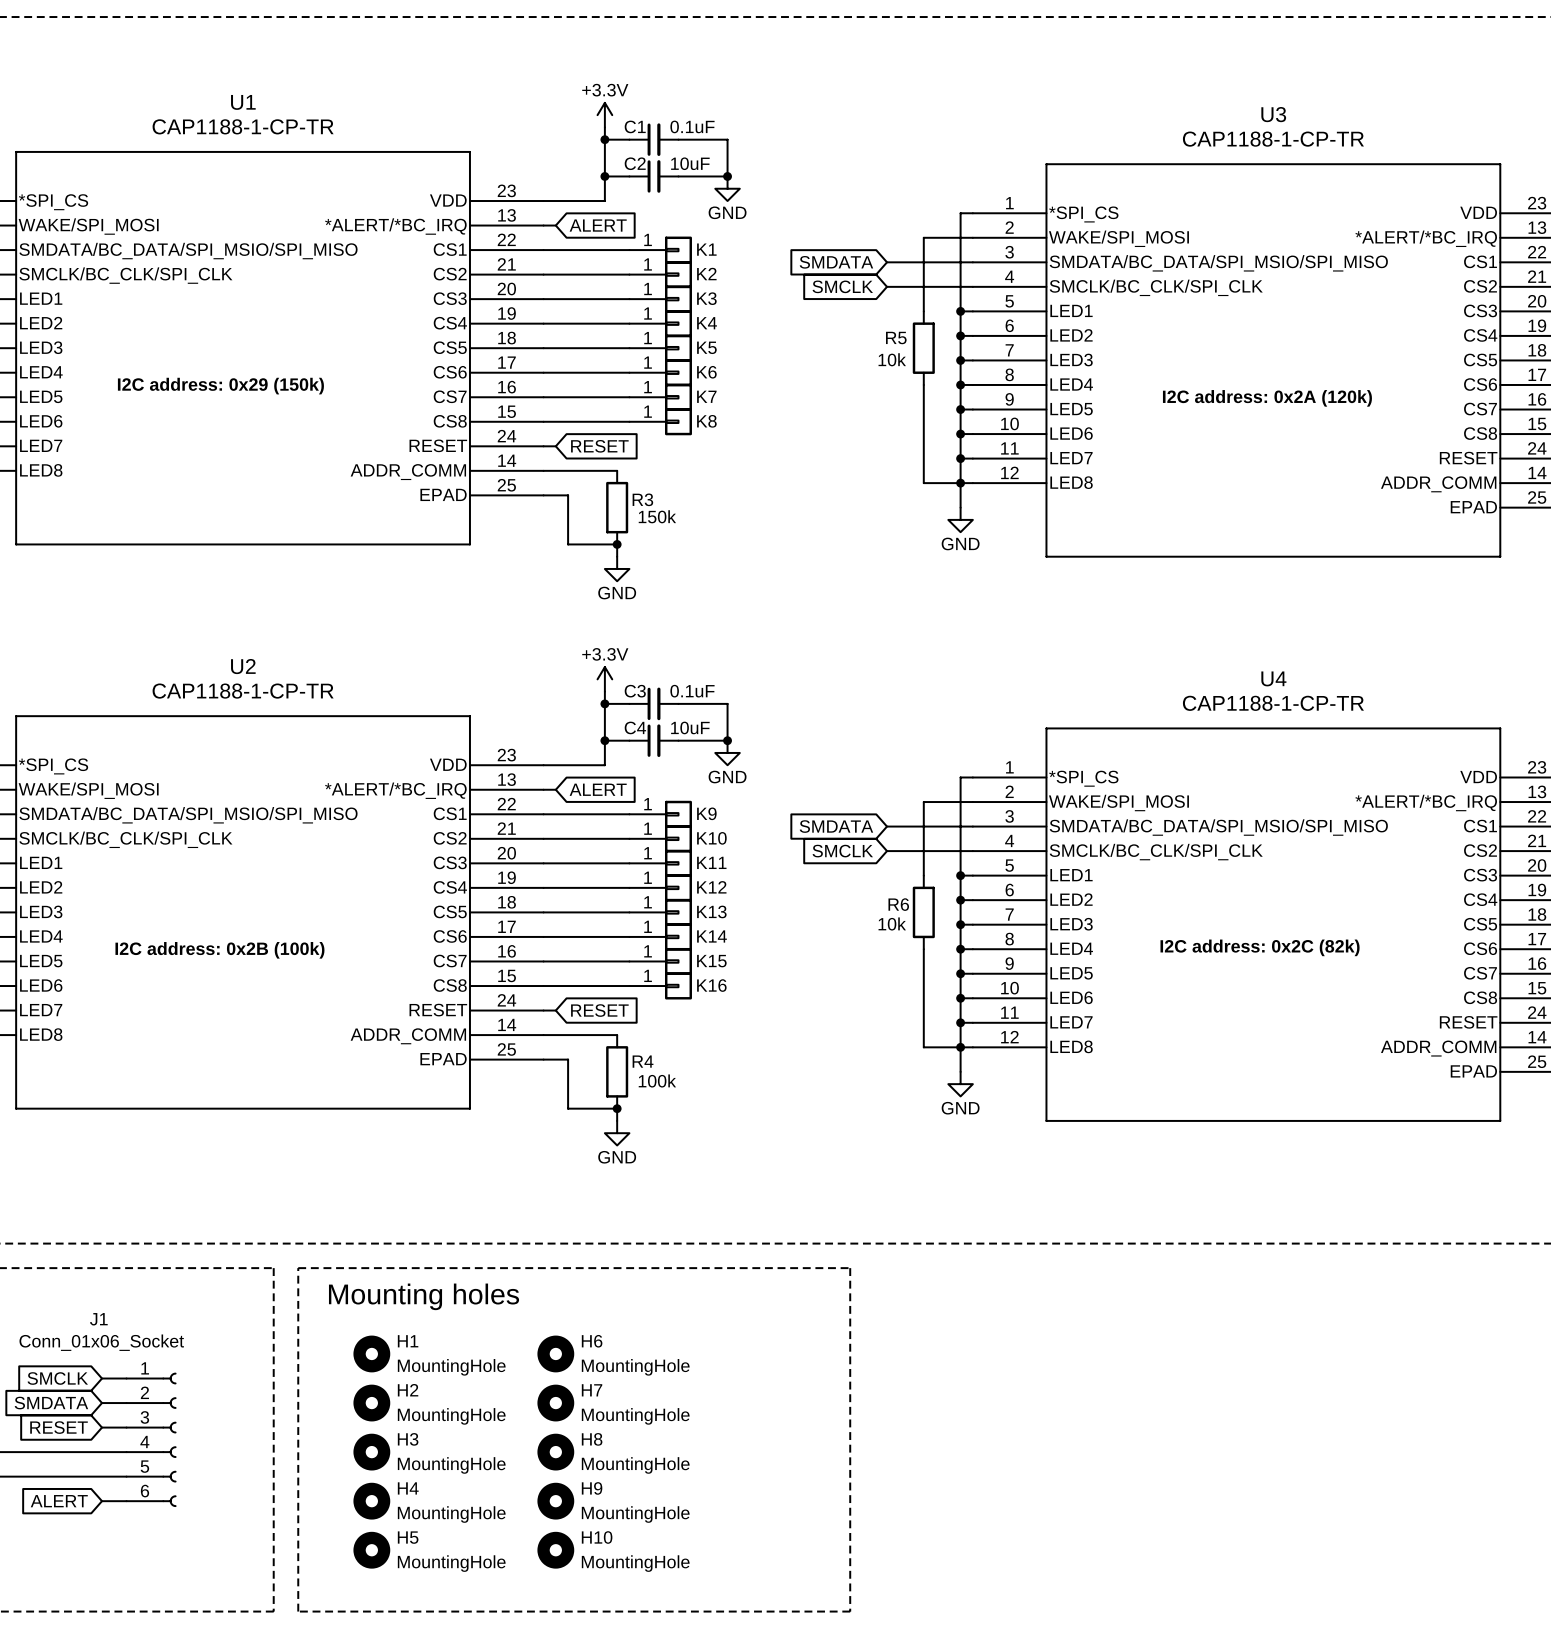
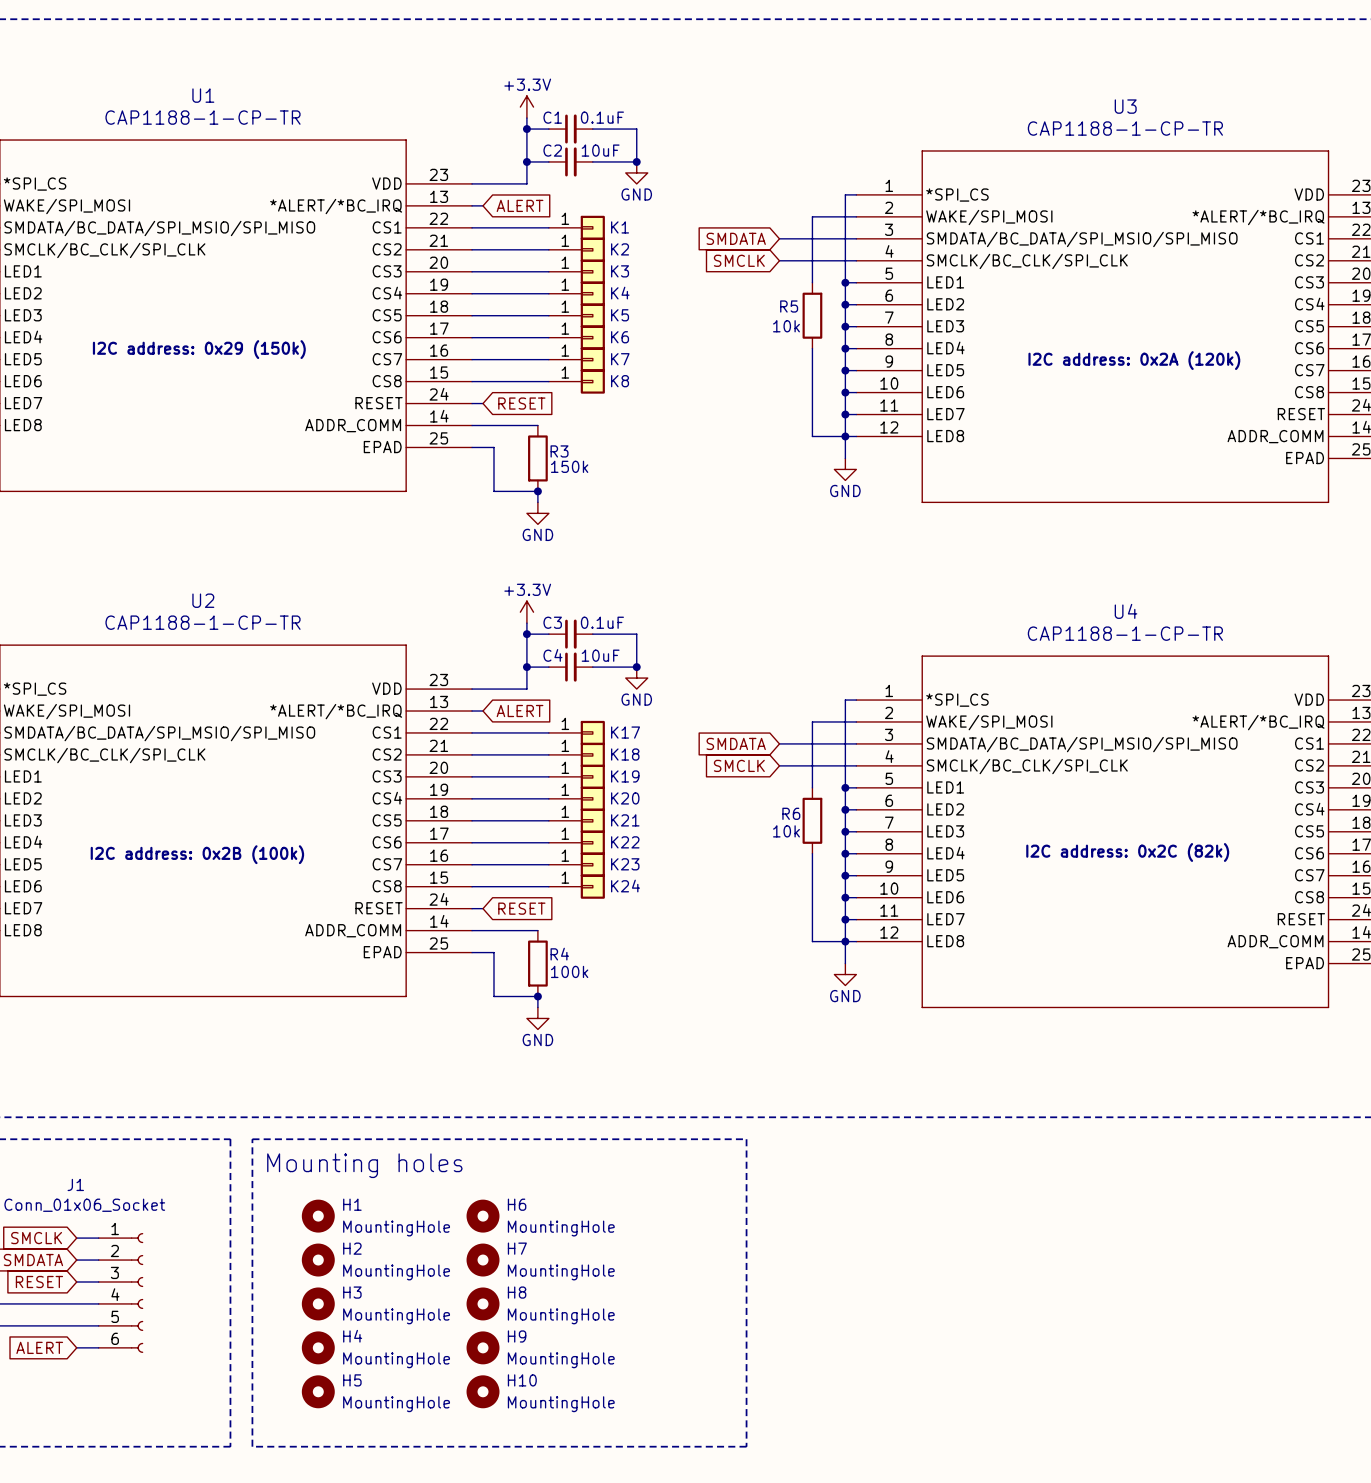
K9 name: K9 (706, 813) -> K17 (625, 732)
K10 name: K10 (711, 838) -> K18 (625, 754)
K11 name: K11 (711, 862) -> K19 (625, 776)
K12 name: K12 (711, 887) -> K20 (625, 798)
K13 name: K13 (711, 911) -> K21 (625, 820)
K14 name: K14 (711, 936) -> K22 (625, 842)
K15 name: K15 (711, 961) -> K23 (625, 864)
K16 name: K16 (711, 985) -> K24 (625, 886)

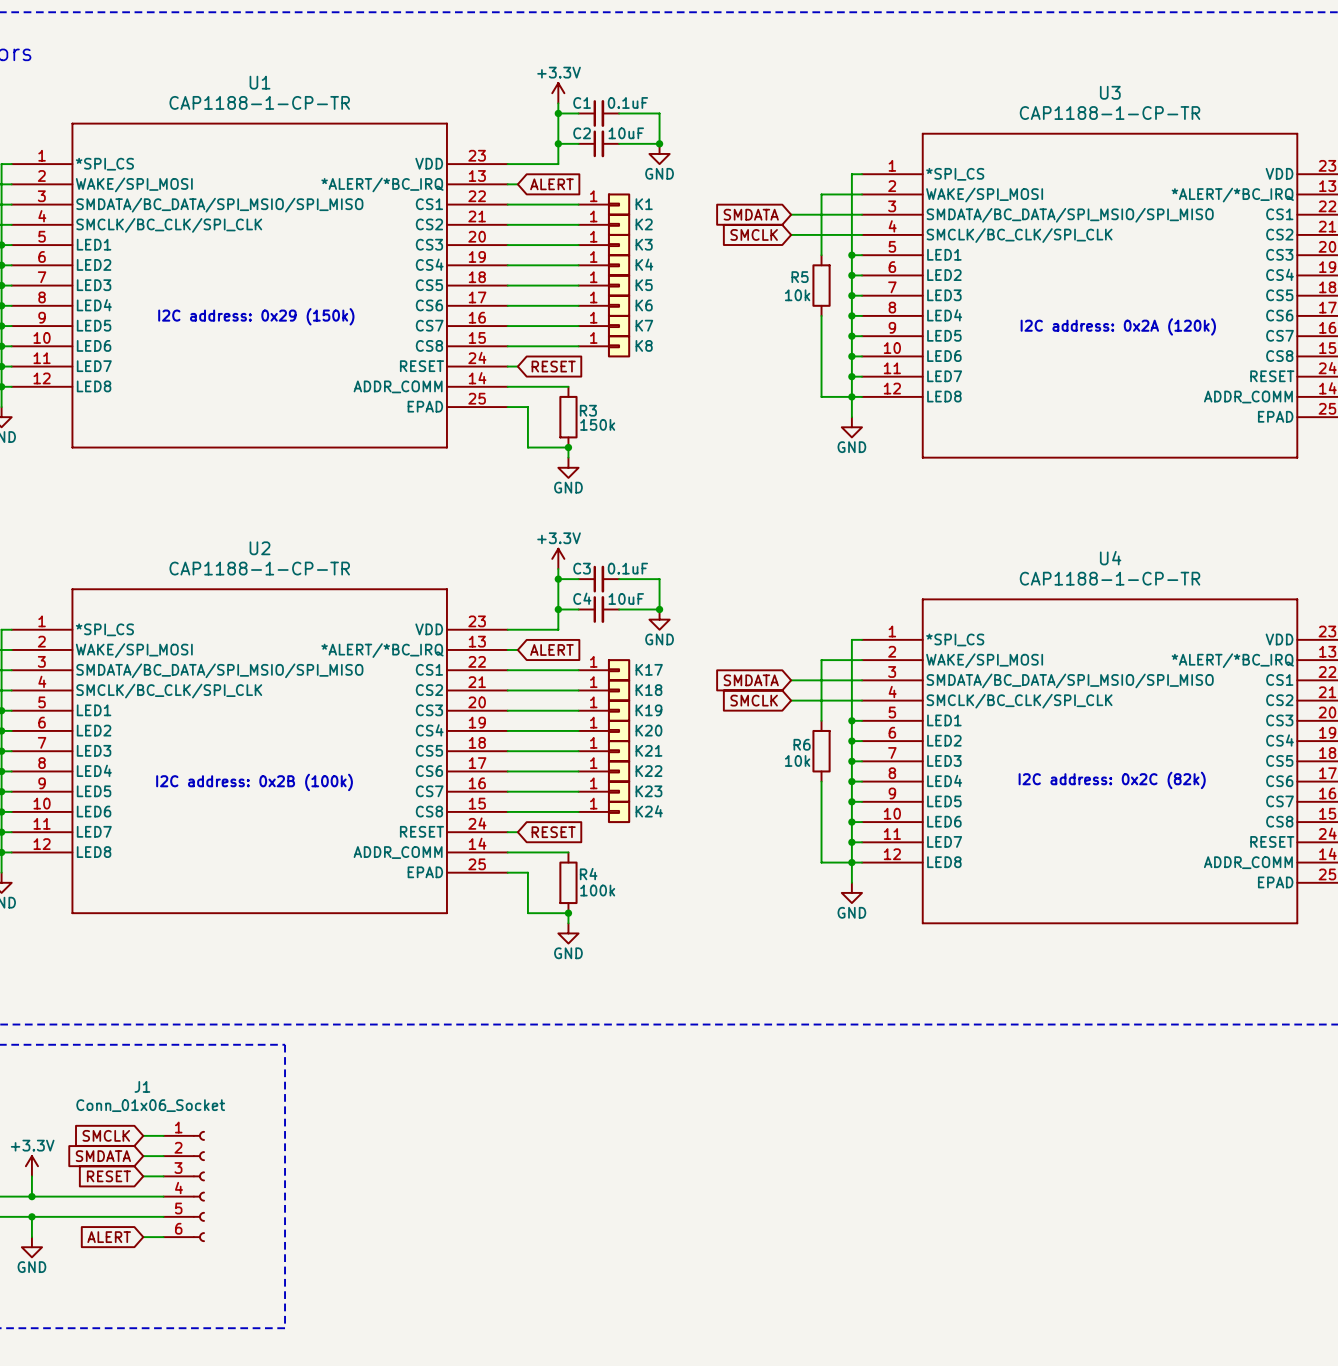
line: (252, 1139) (746, 1139) (746, 1446) (252, 1446) (252, 1139) -> none
text: Mounting holes (364, 1165) -> none
H1: MountingHole (318, 1216) -> none
H6: MountingHole (483, 1216) -> none
H2: MountingHole (318, 1260) -> none
H7: MountingHole (483, 1260) -> none
H3: MountingHole (318, 1303) -> none
H8: MountingHole (483, 1303) -> none
H4: MountingHole (318, 1347) -> none
H9: MountingHole (483, 1347) -> none
H5: MountingHole (318, 1391) -> none
H10: MountingHole (483, 1391) -> none

